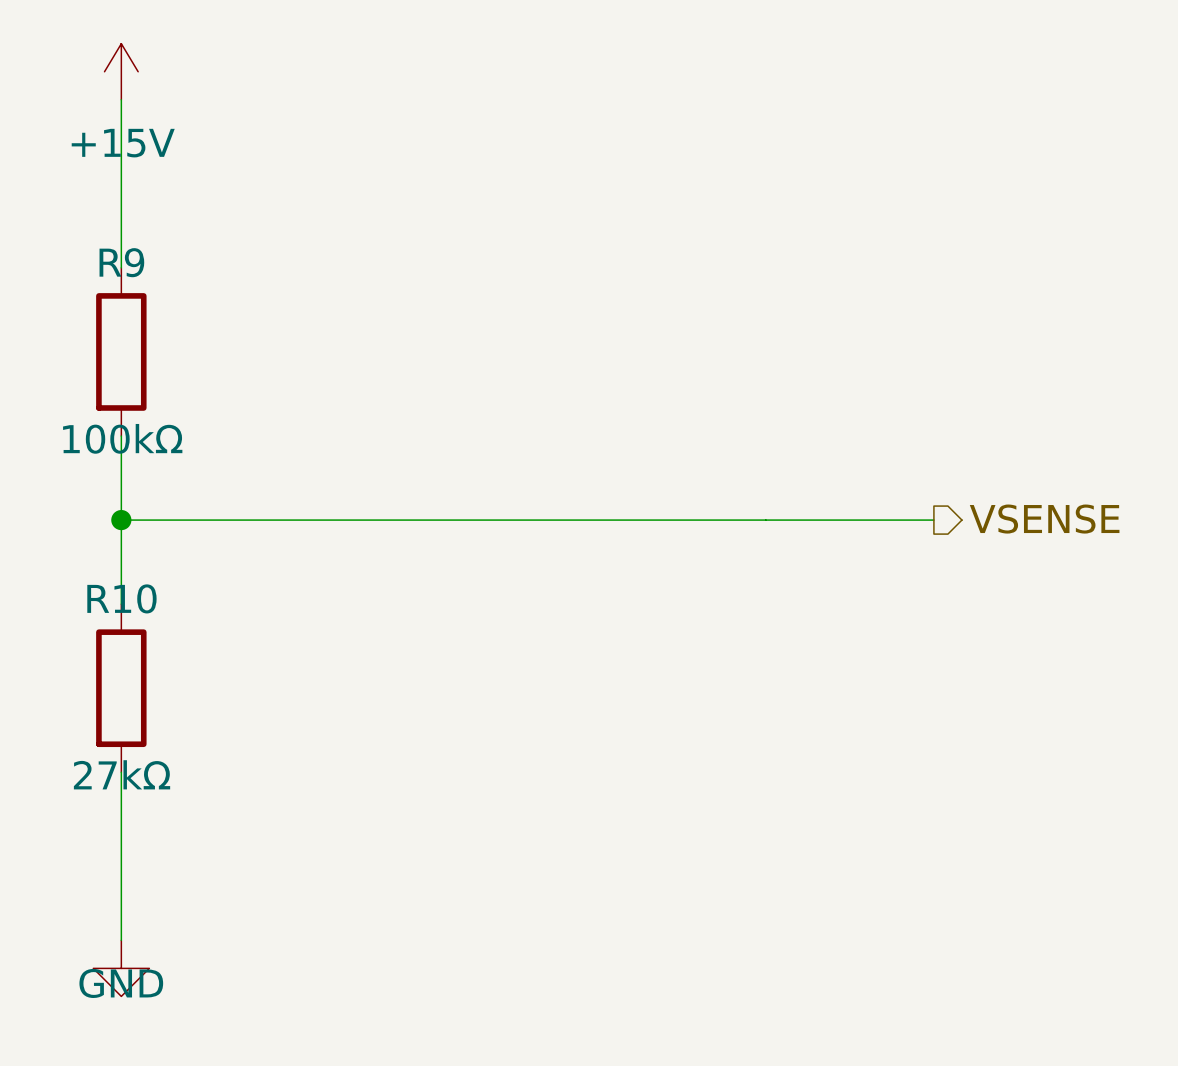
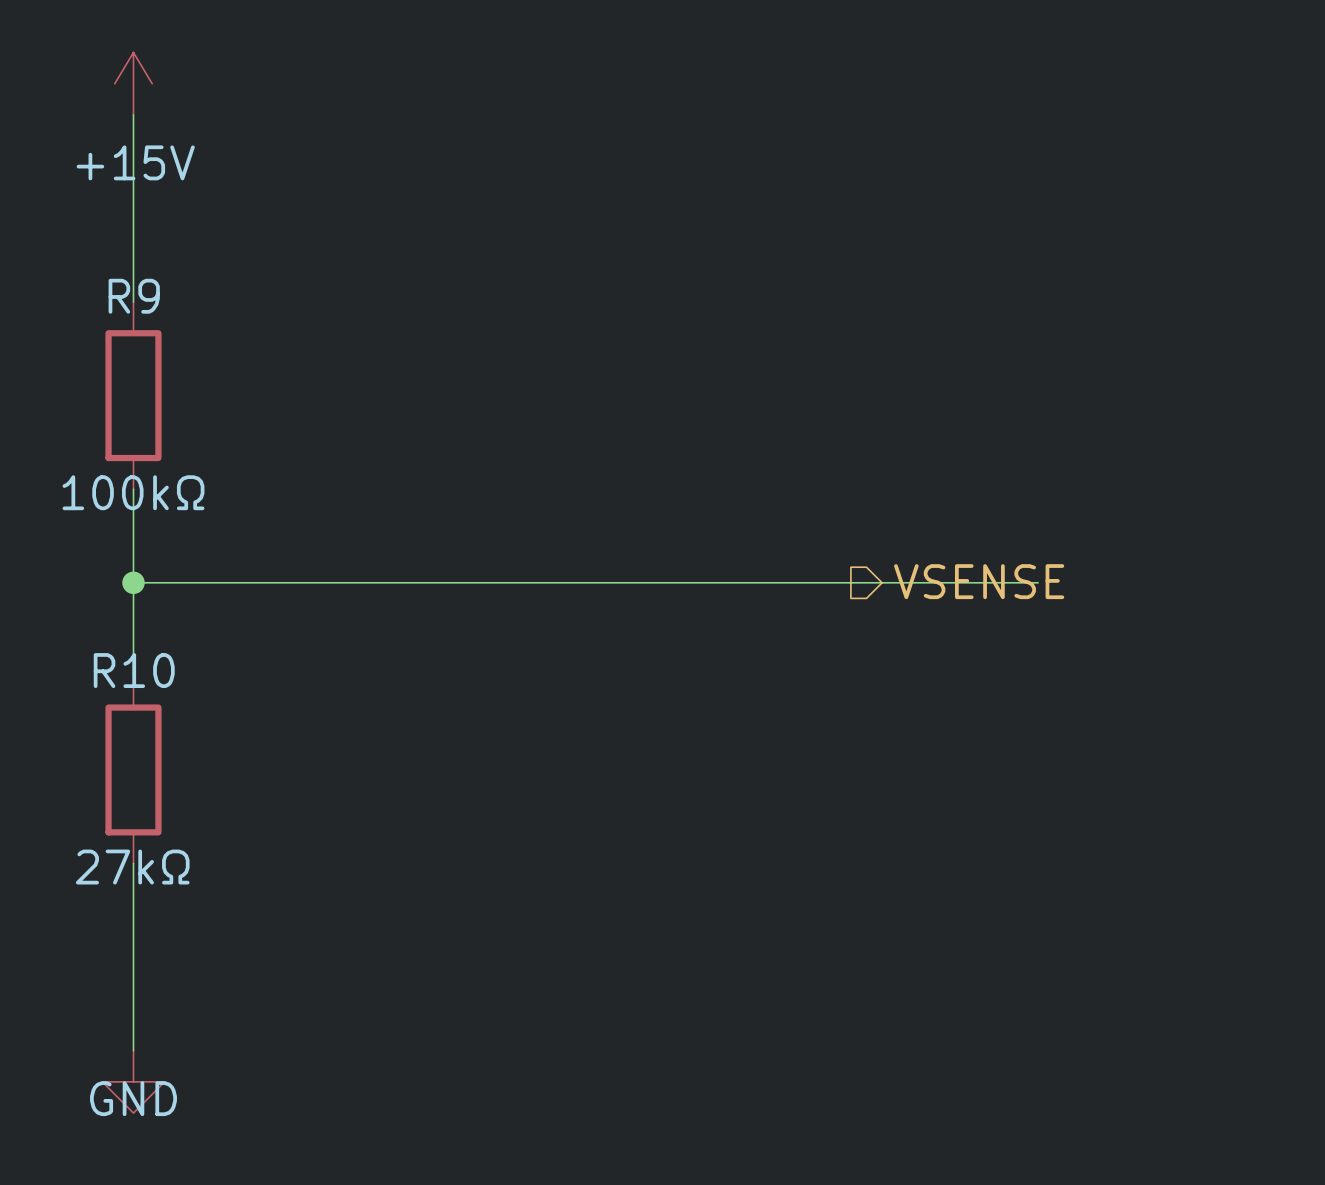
hierarchical label position: VSENSE (1044, 519) -> VSENSE (979, 581)

